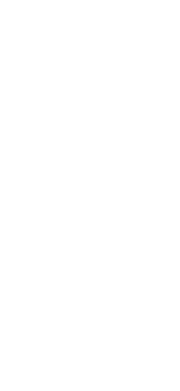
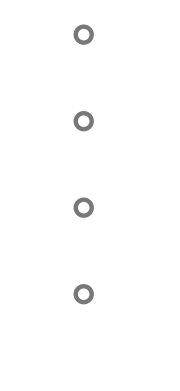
via: none -> (83, 34)
via: none -> (83, 121)
via: none -> (83, 207)
via: none -> (83, 294)

